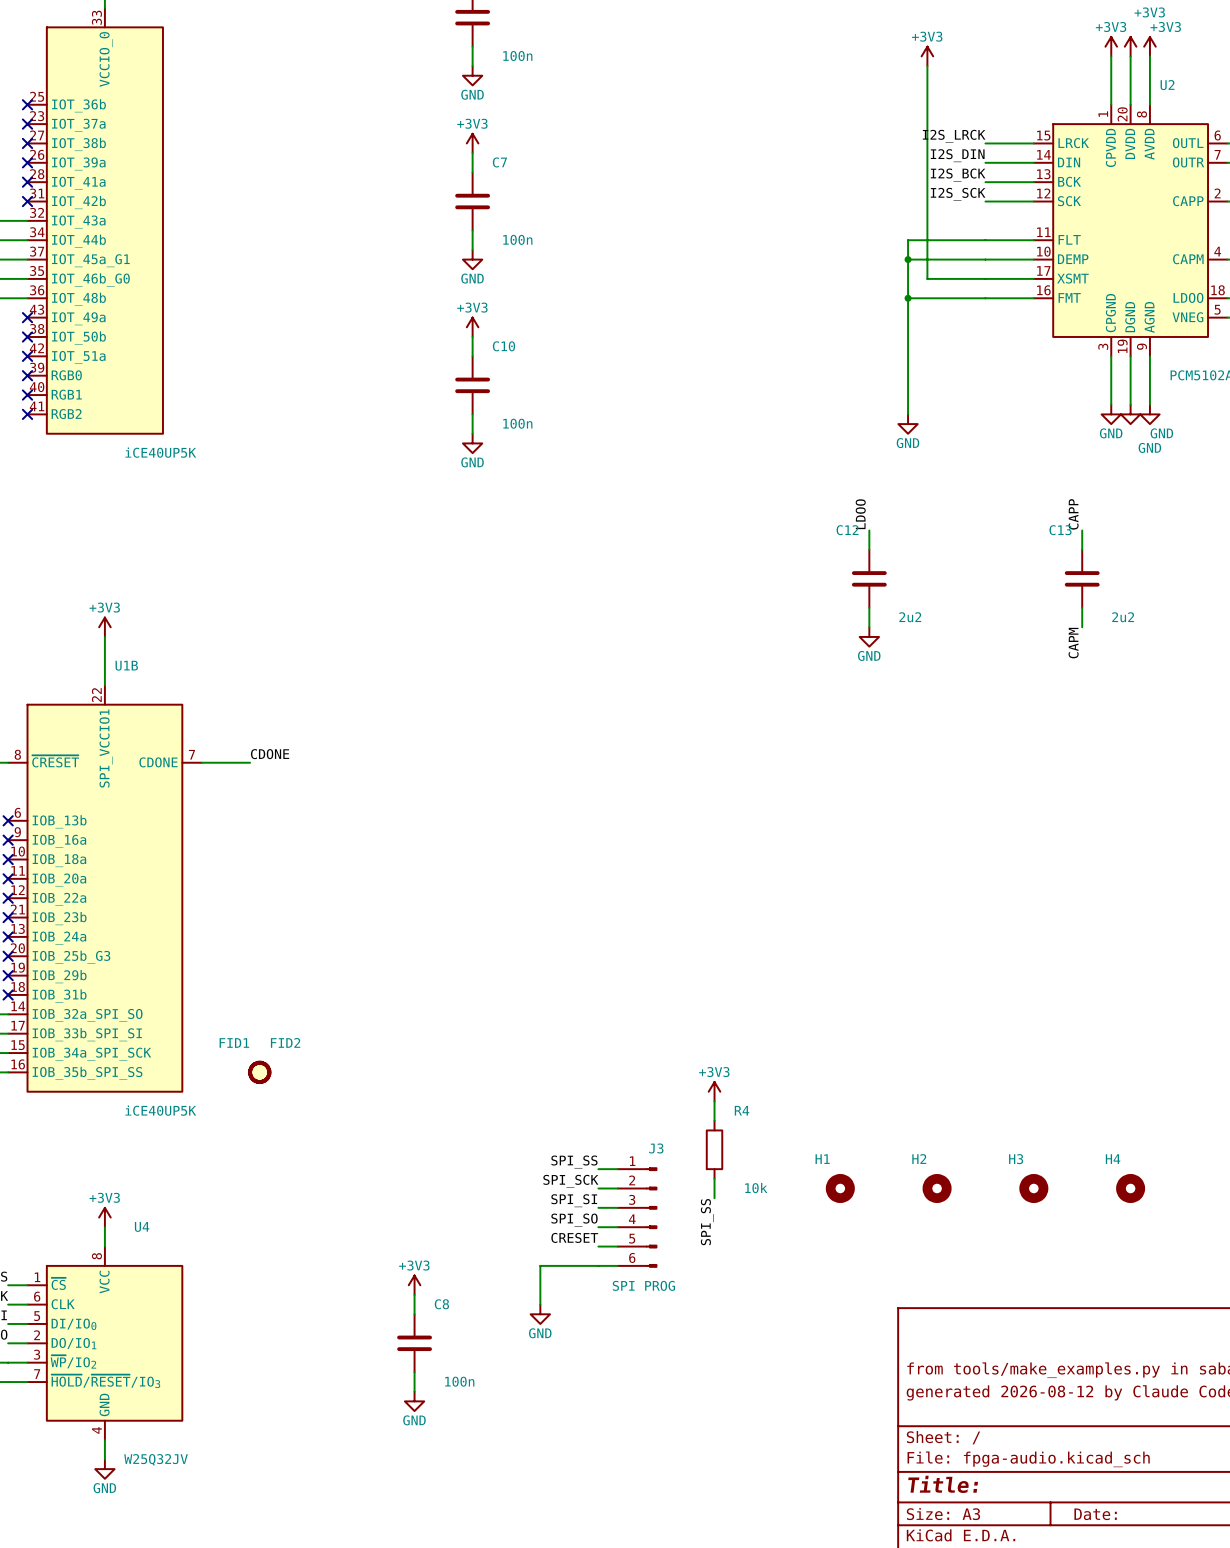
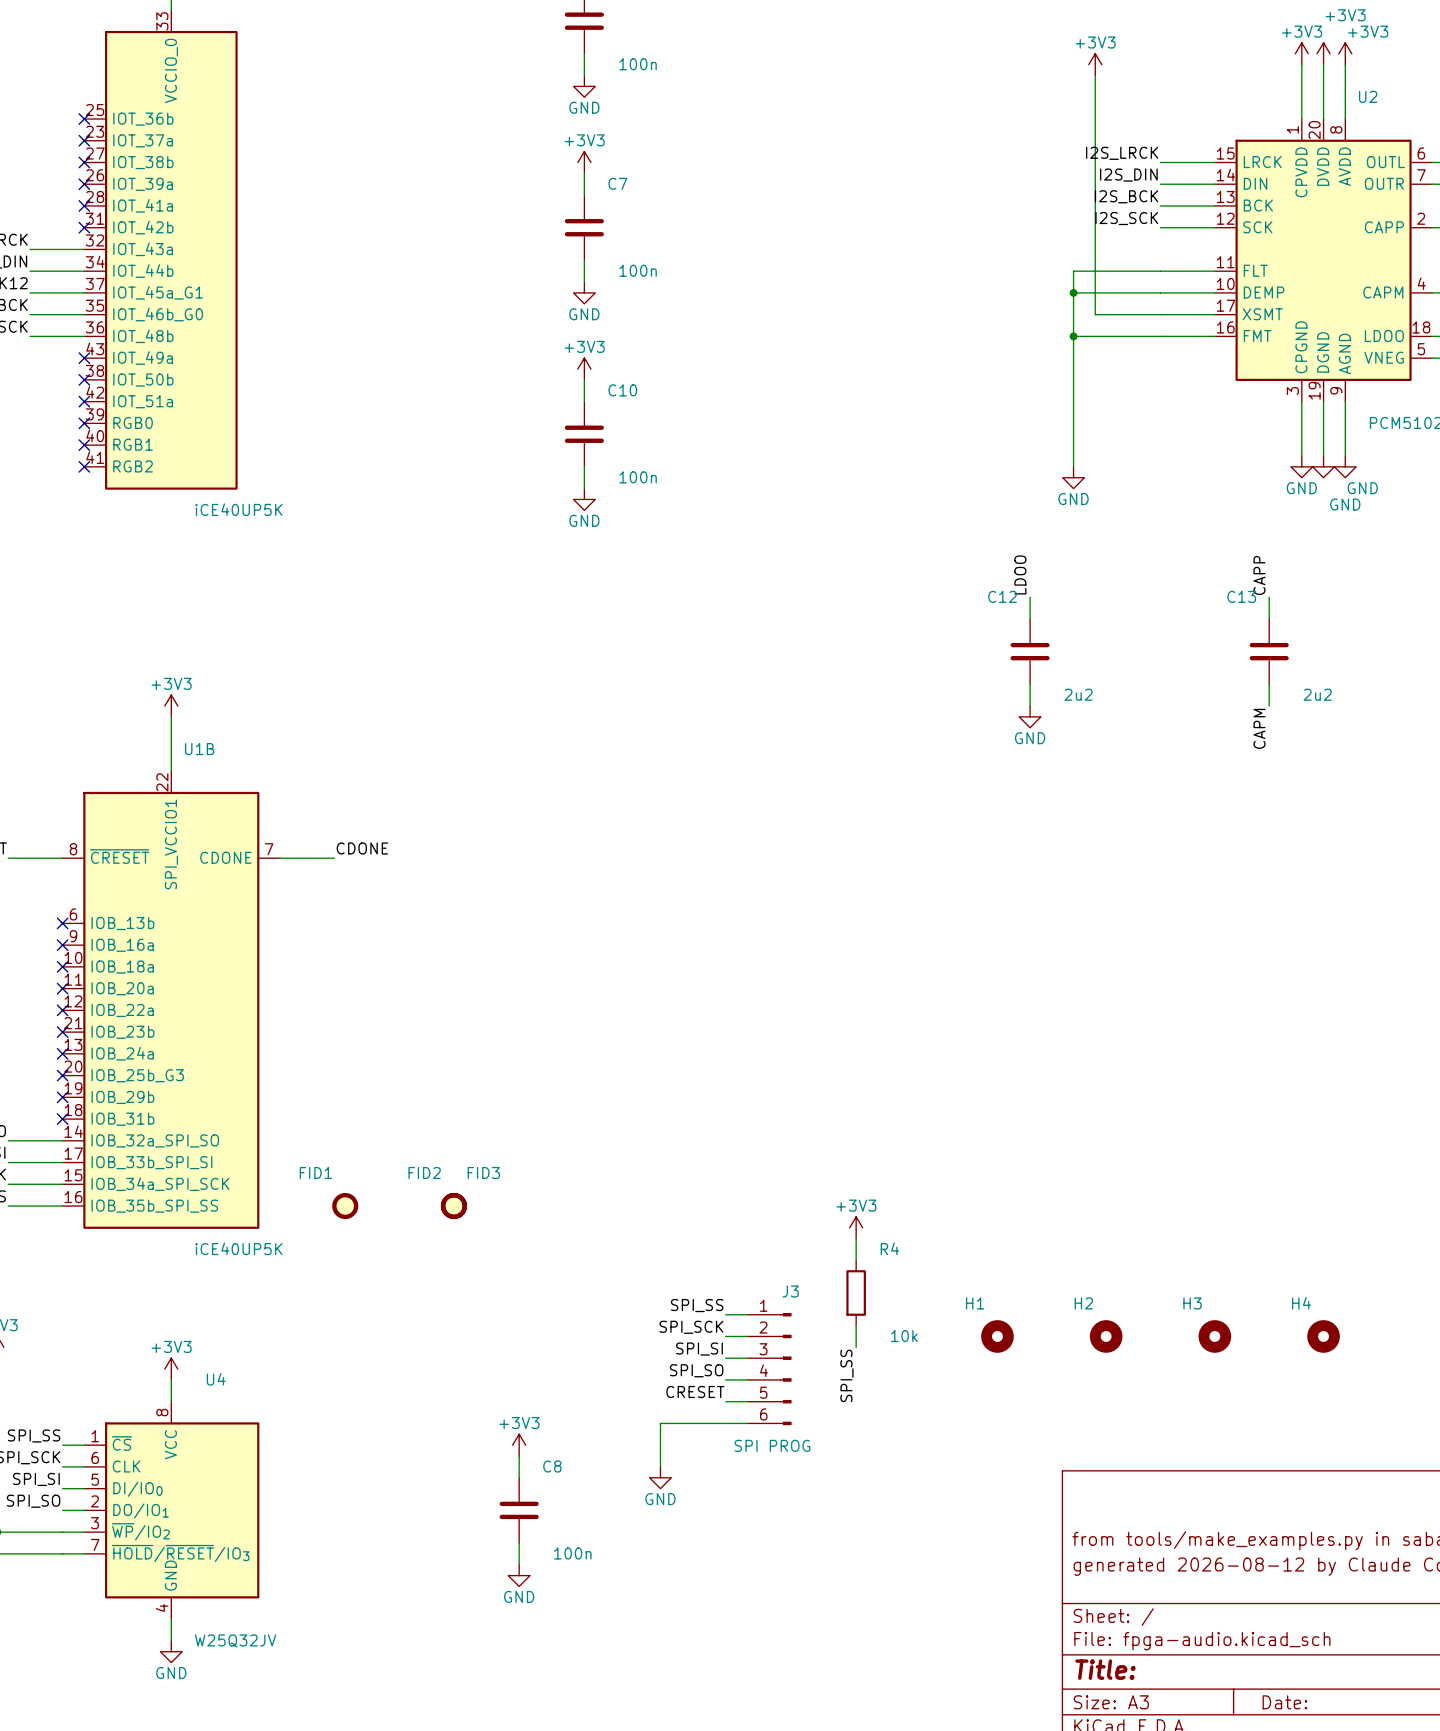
FID2 name position: FID2 (285, 1042) -> FID2 (424, 1173)
FID2 position: (259, 1072) -> (453, 1206)
FID3: none -> (453, 1206)

